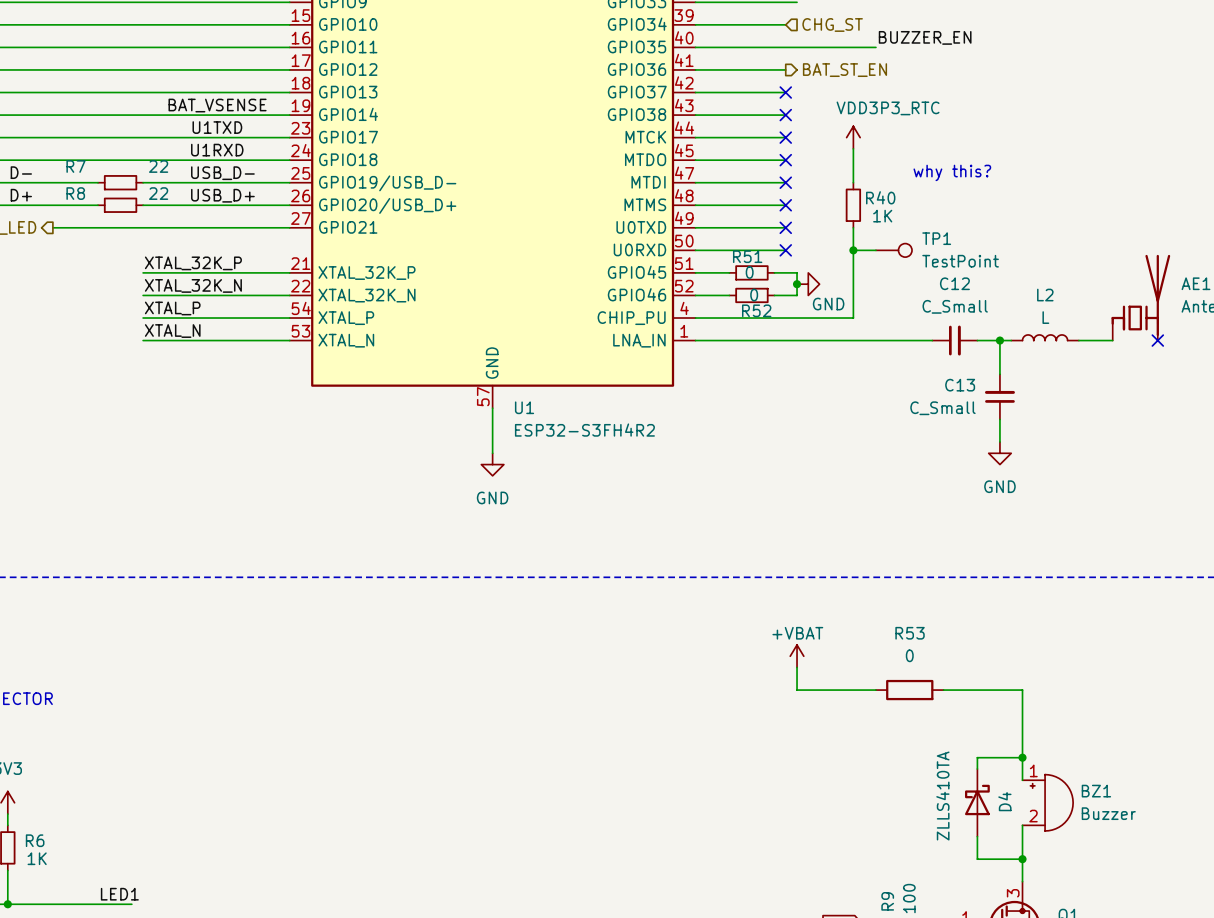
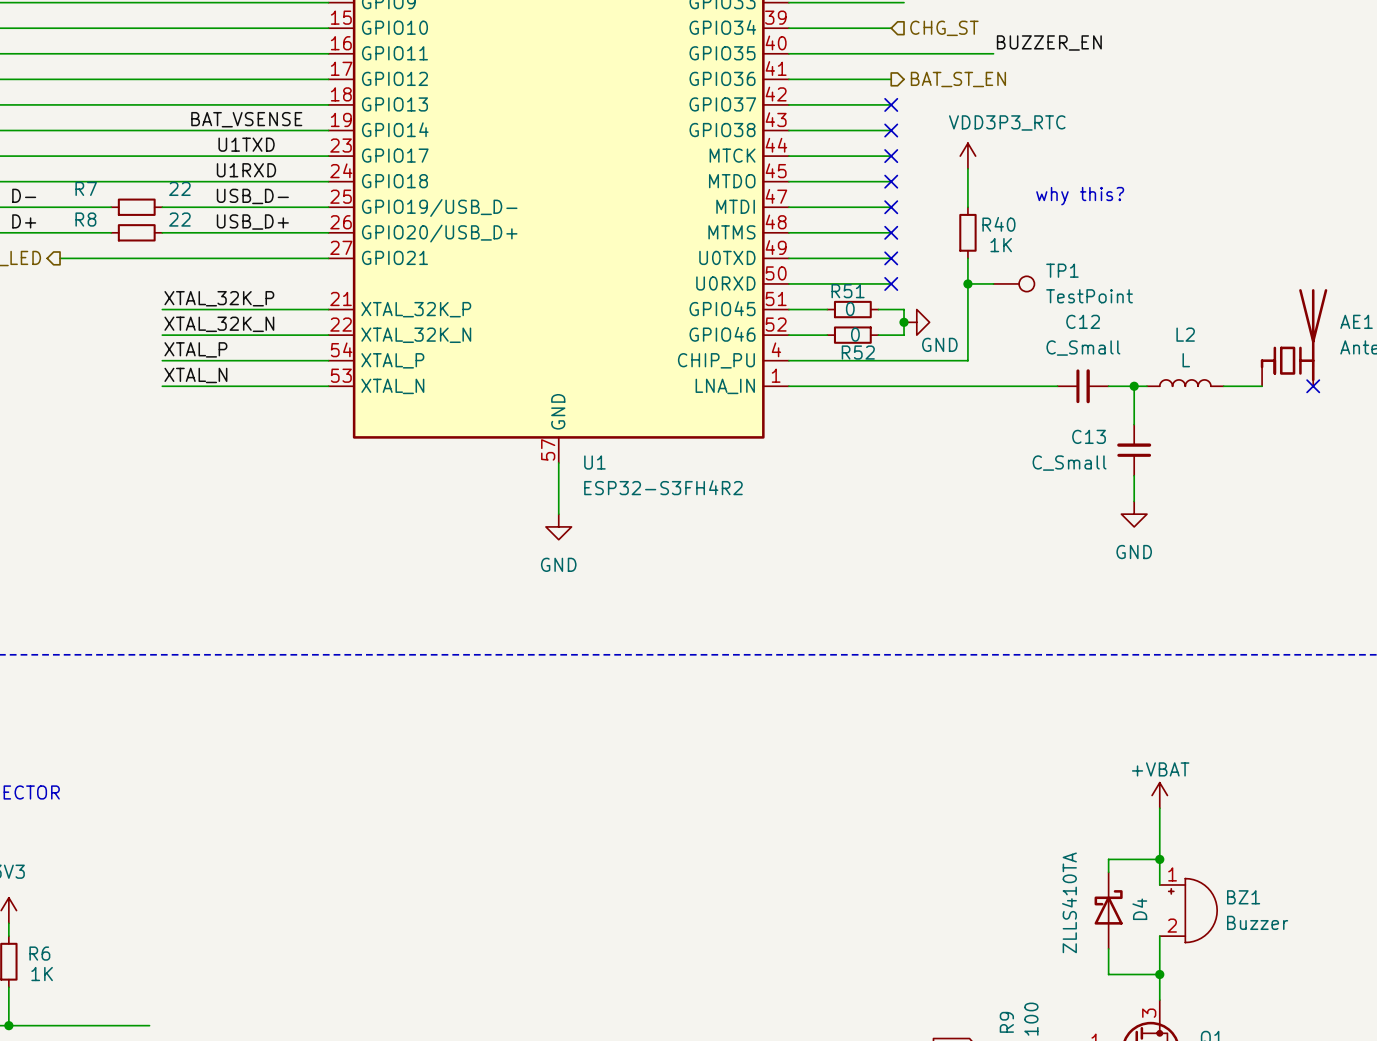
power symbol: +VBAT (797, 656) -> none
wire: (797, 667) (797, 690) (875, 690) -> none
R53: 0 (909, 690) -> none
wire: (943, 690) (1022, 690) (1022, 712) -> none
power symbol: none -> +VBAT (1159, 795)
label: LED1 (119, 894) -> none

